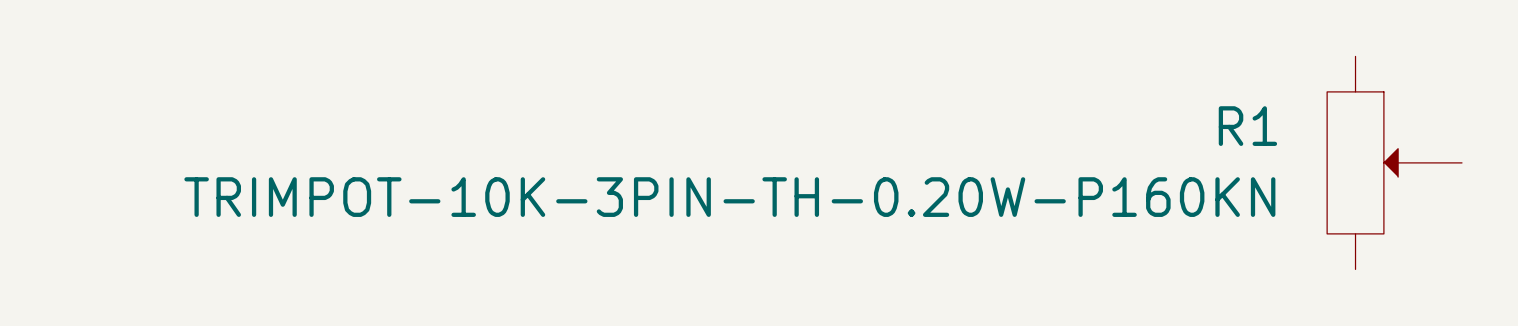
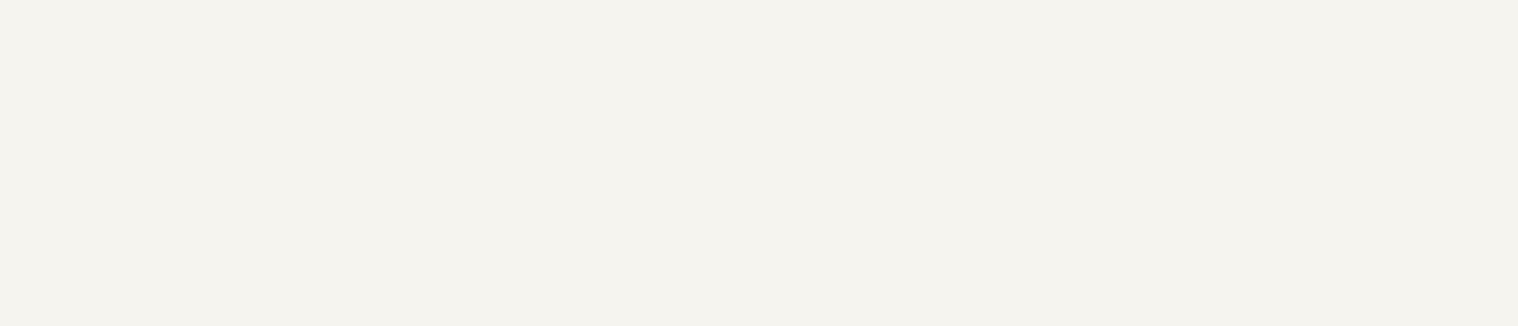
R1: TRIMPOT-10K-3PIN-TH-0.20W-P160KN (1394, 162) -> none

